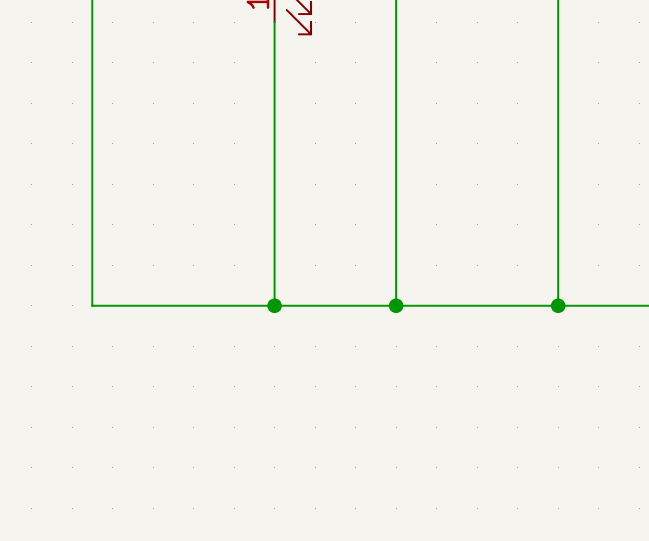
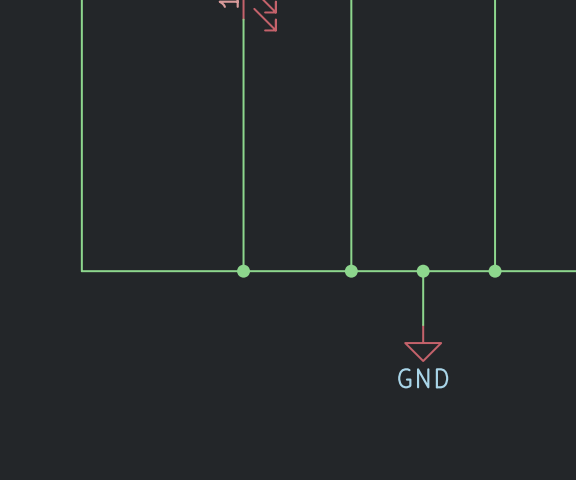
wire: none -> (423, 271) (423, 325)
junction: none -> (423, 271)
power symbol: none -> GND (423, 343)

